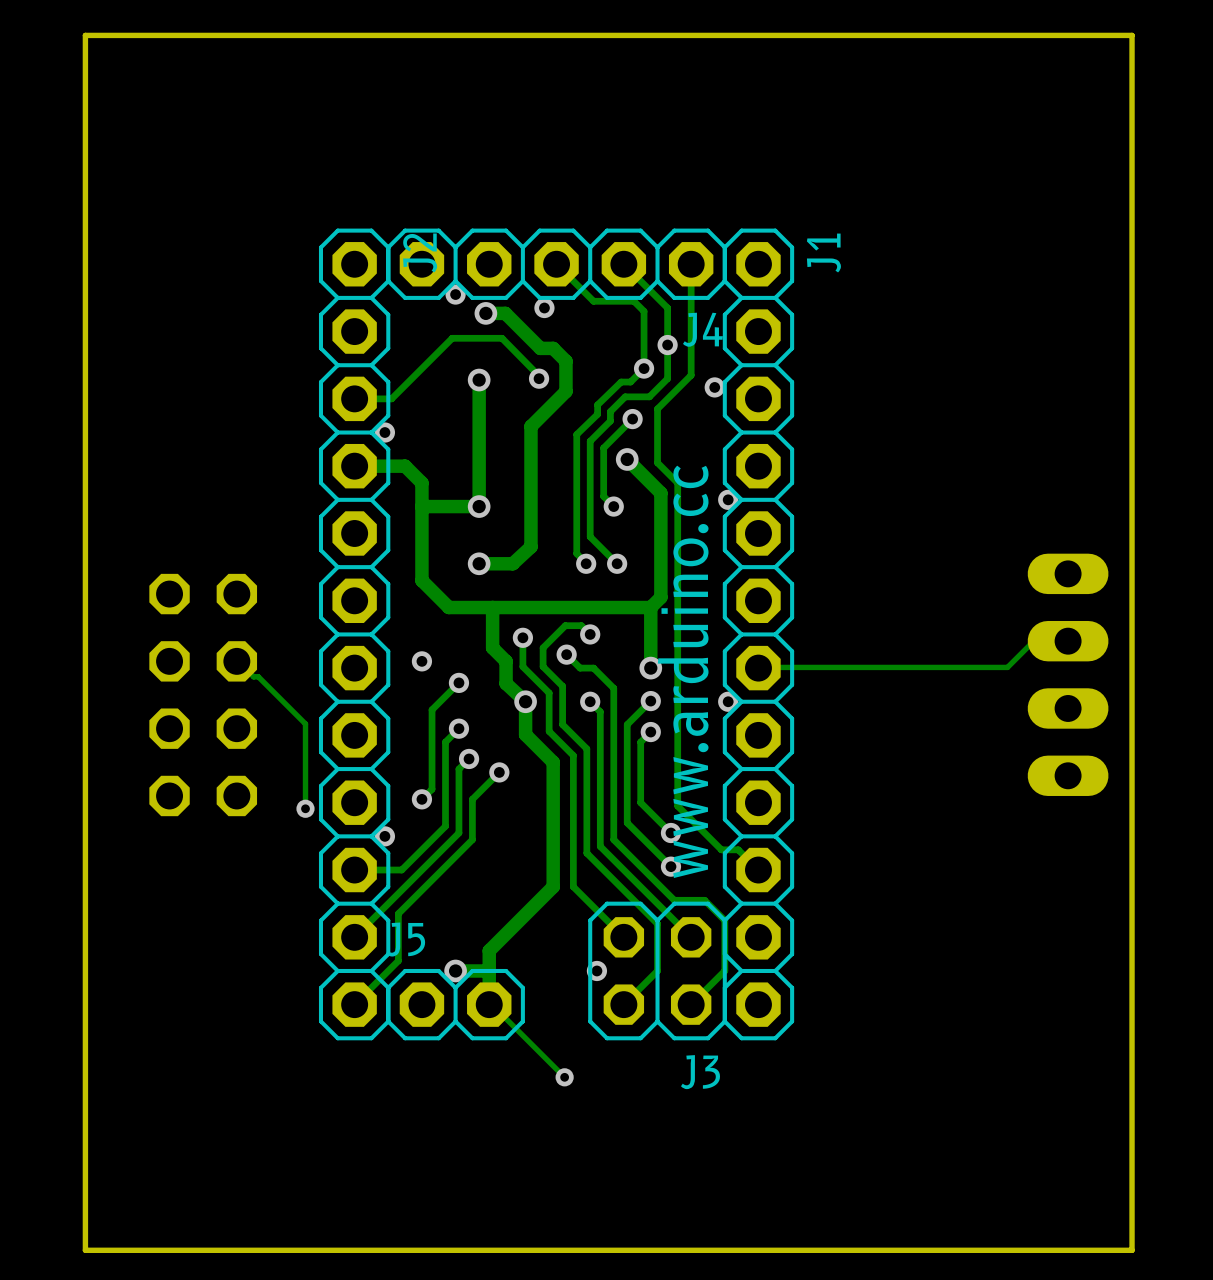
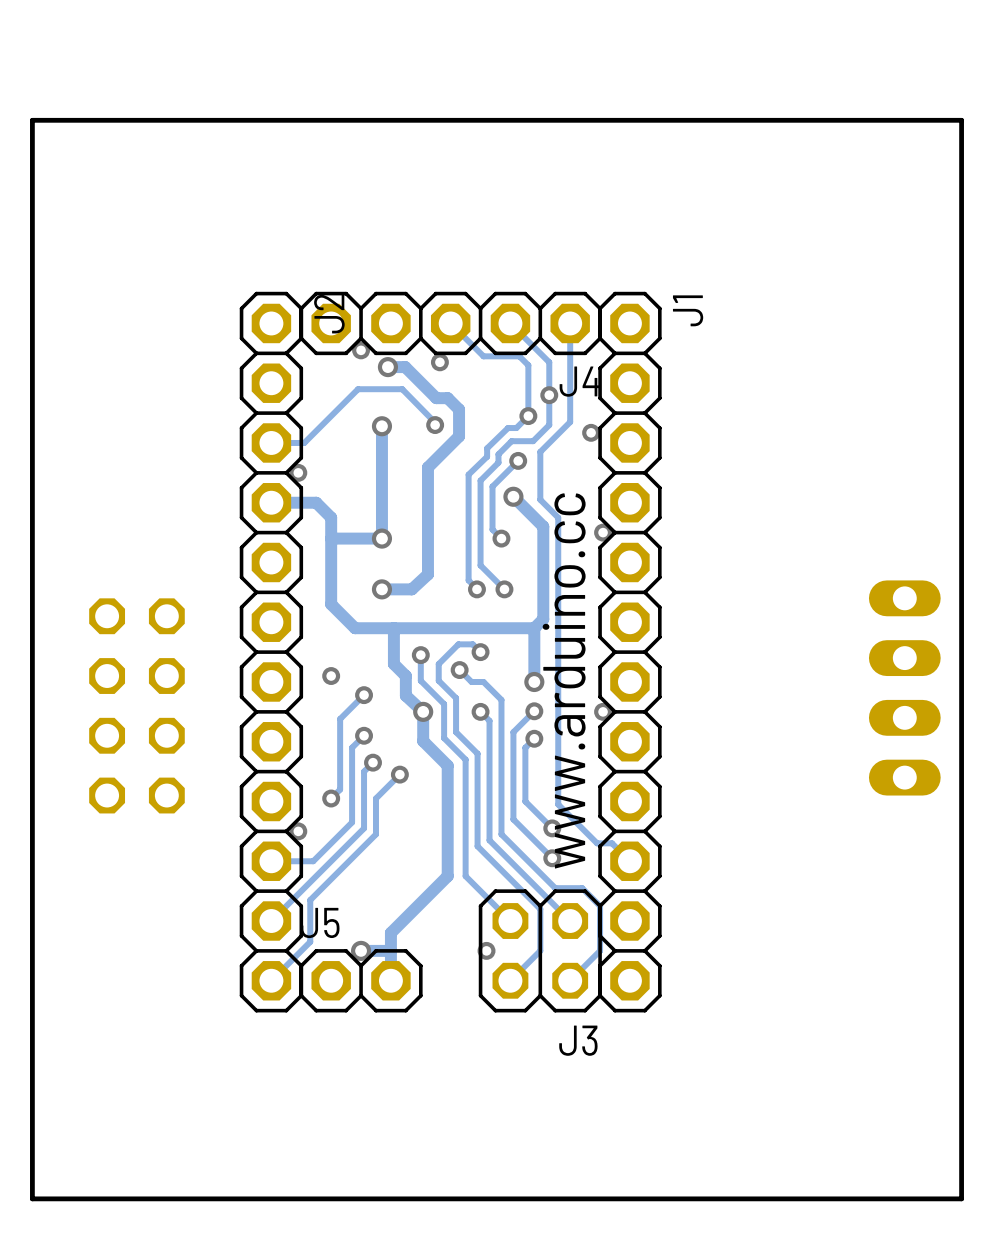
track: (1068, 641) (1064, 643) (1031, 643) (1007, 667) (758, 668) -> none
track: (236, 661) (253, 676) (258, 676) (305, 723) (305, 808) -> none
via: (305, 808) -> none
track: (489, 1004) (493, 1006) (564, 1077) -> none
via: (564, 1077) -> none

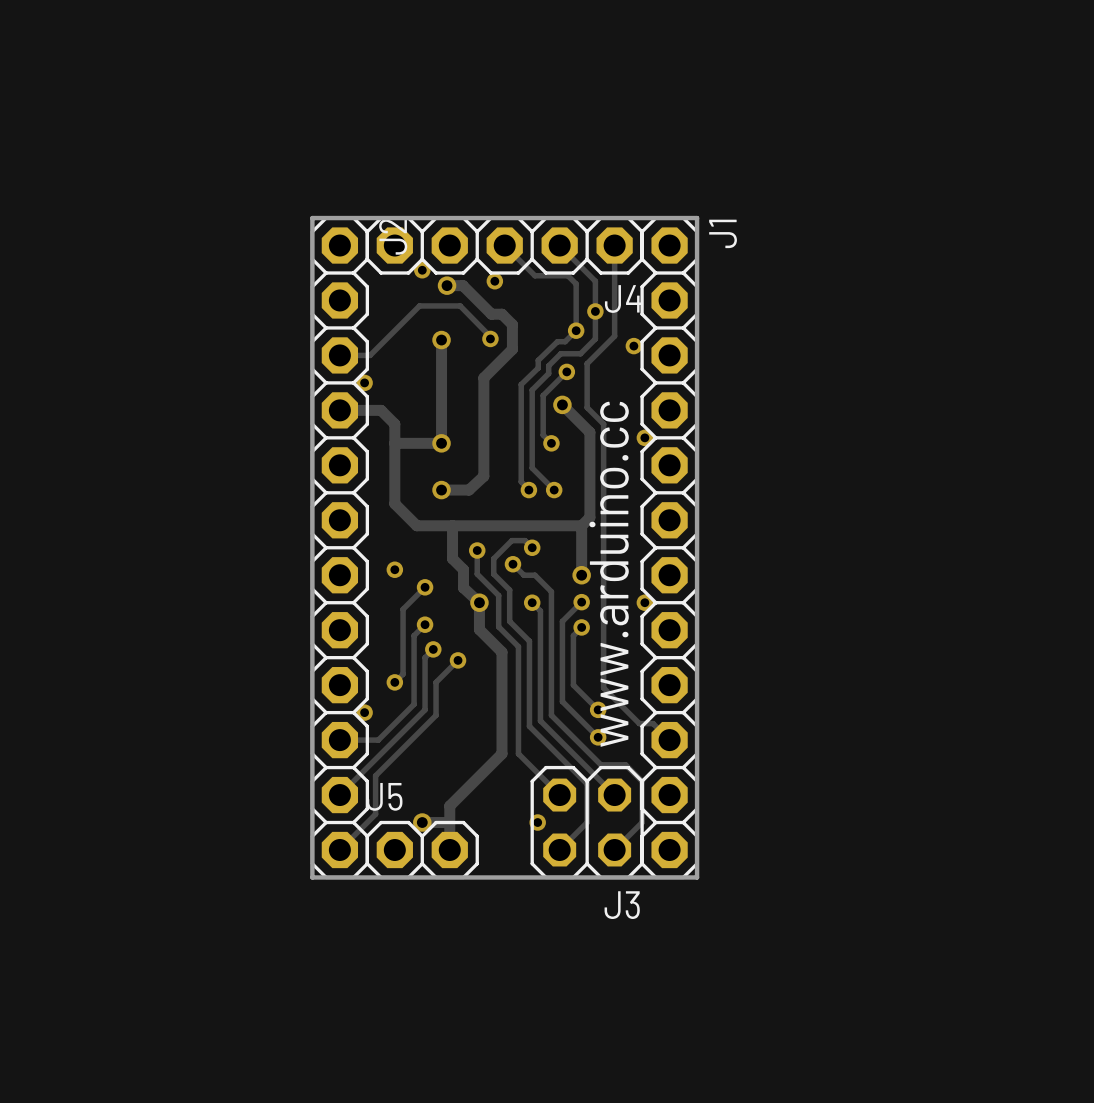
board edge: (961, 120) (961, 1198) (32, 1198) (32, 120) (961, 120) -> none
board edge: none -> (697, 218) (697, 877) (312, 877) (312, 218) (697, 218)
part: (904, 687) -> none
part: (136, 705) -> none

